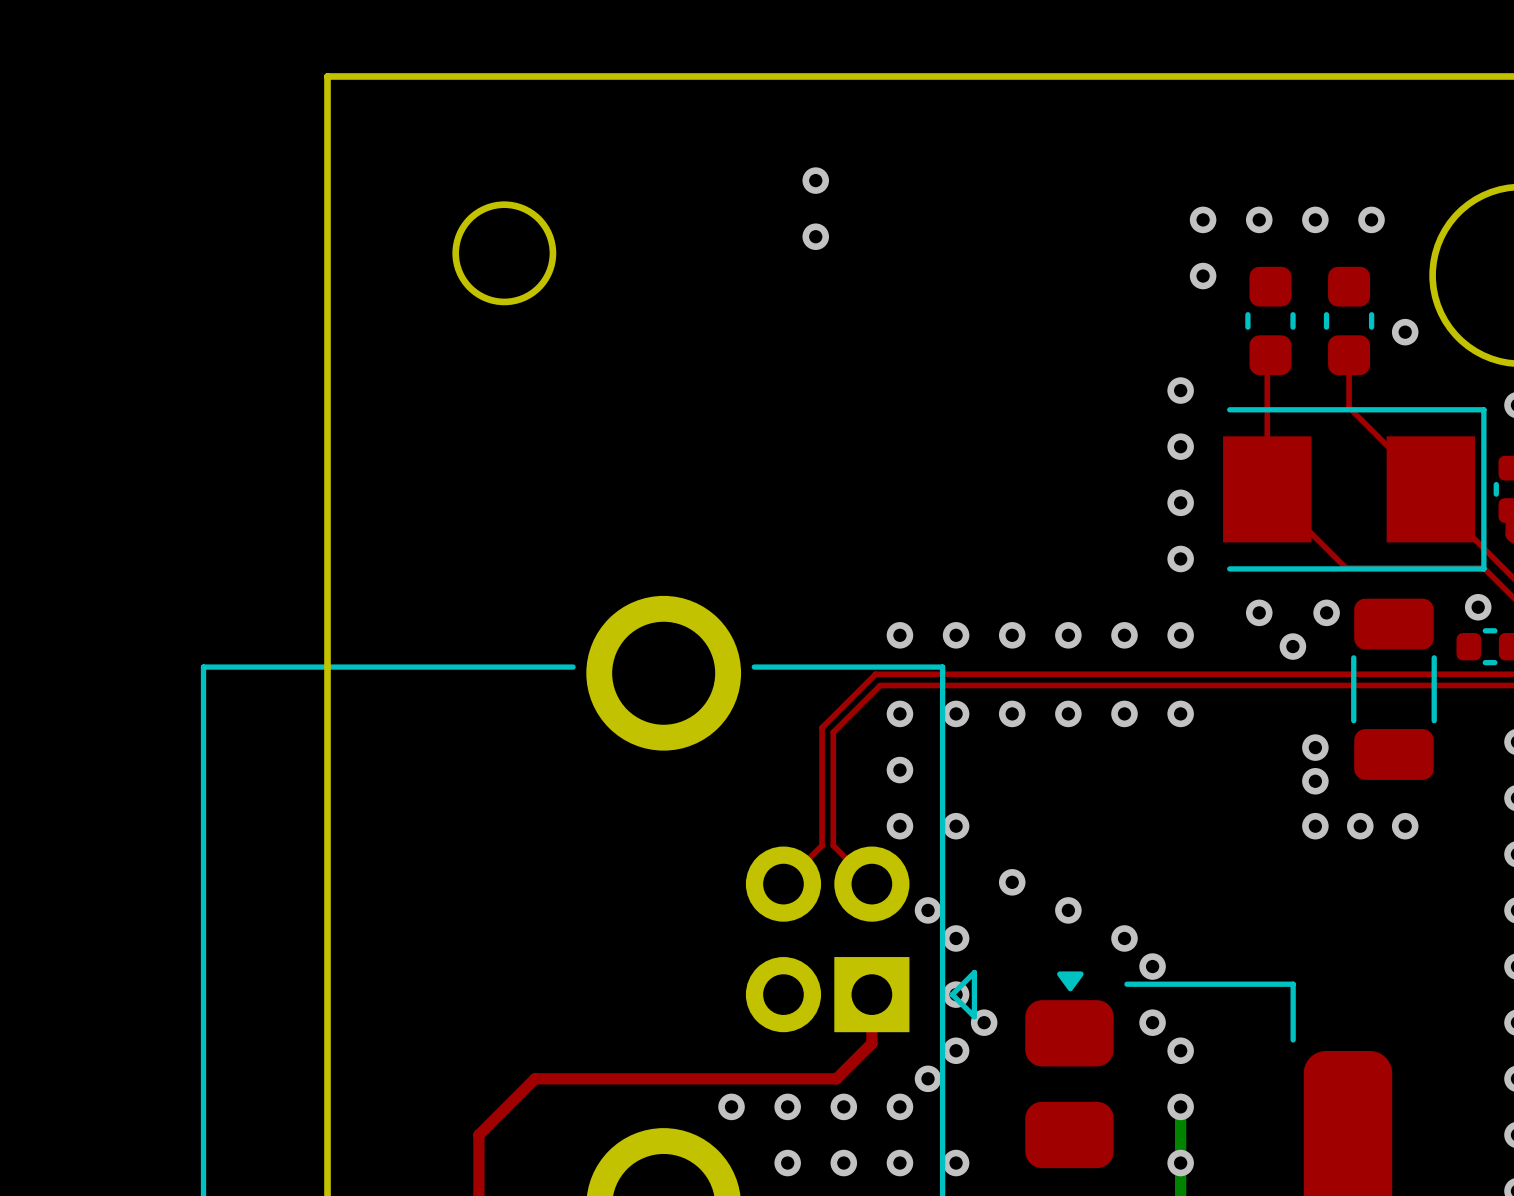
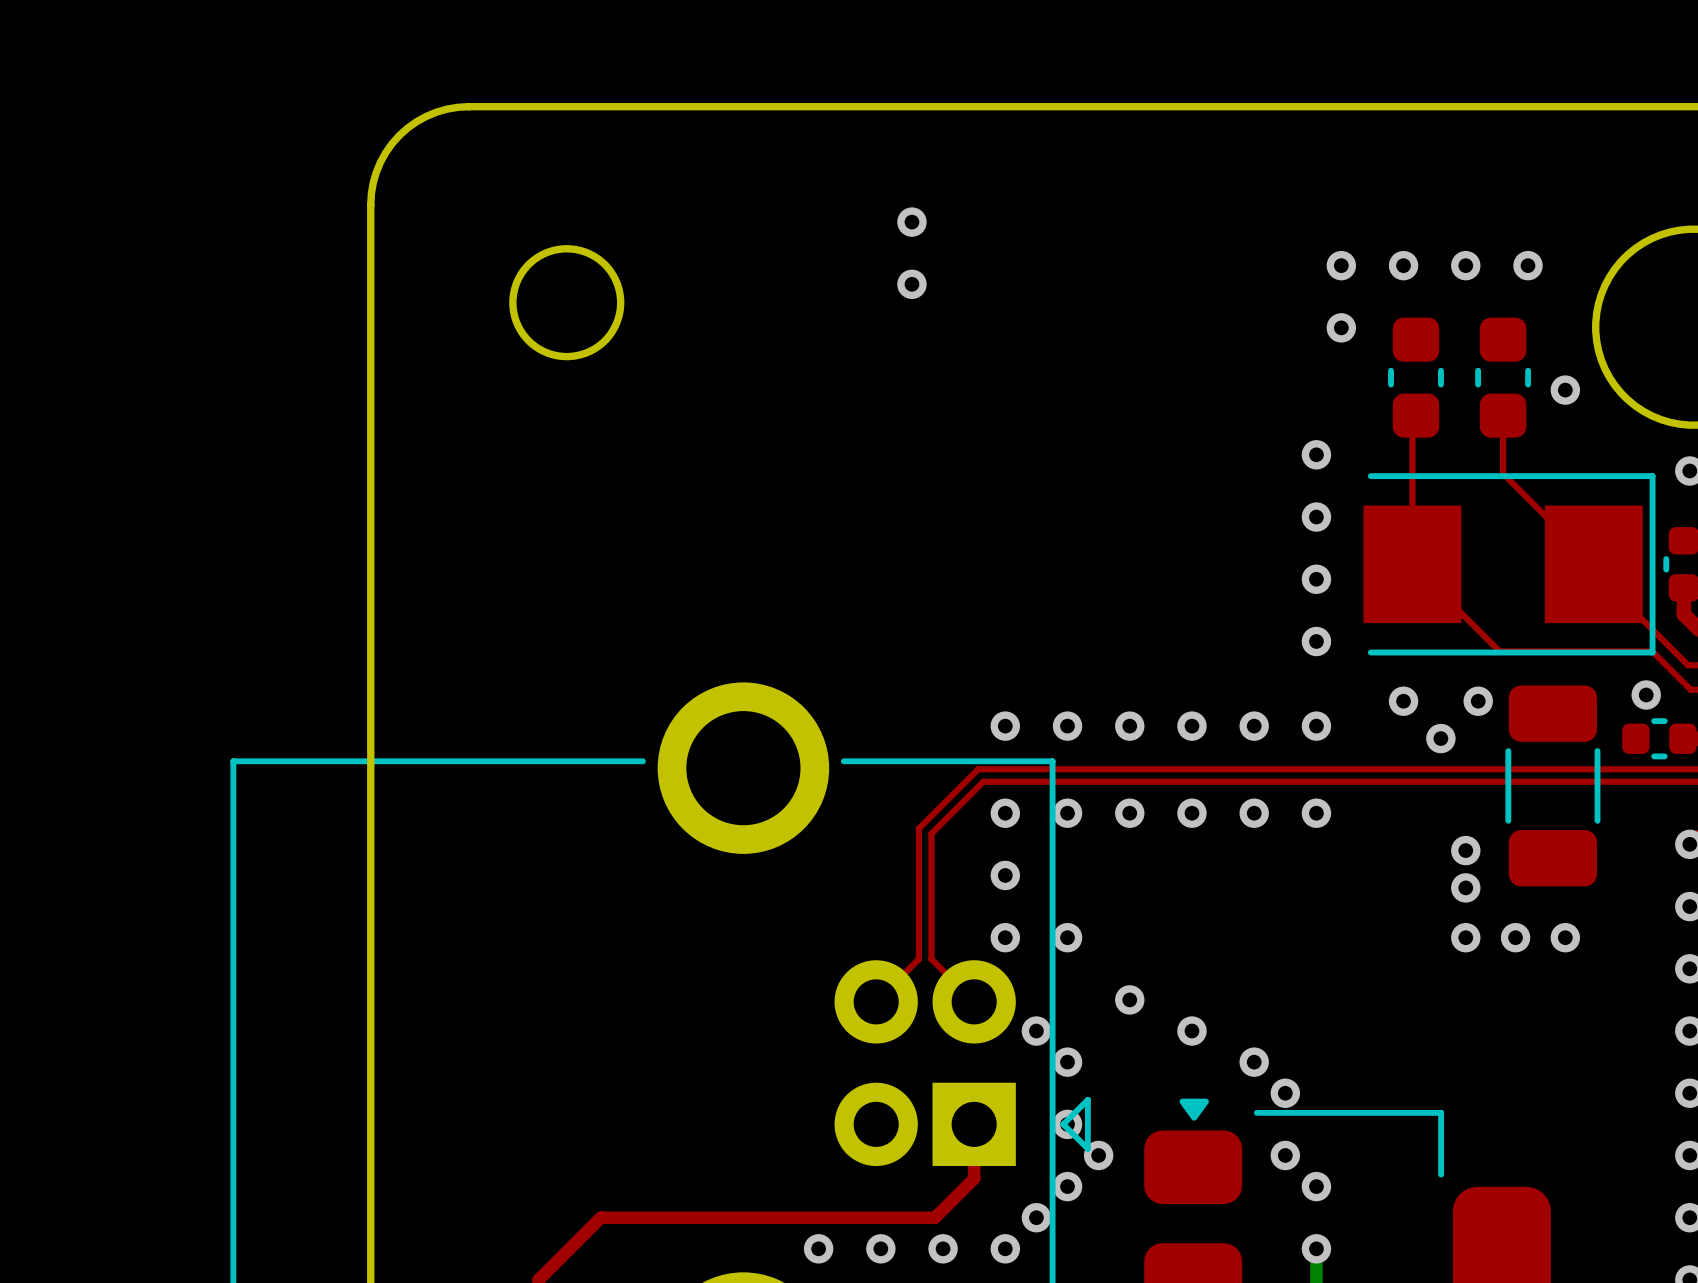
board edge: (415, 76) (327, 76) (327, 164) -> (468, 106) (436, 112) (416, 121) (399, 135) (380, 162) (373, 182) (370, 204)

